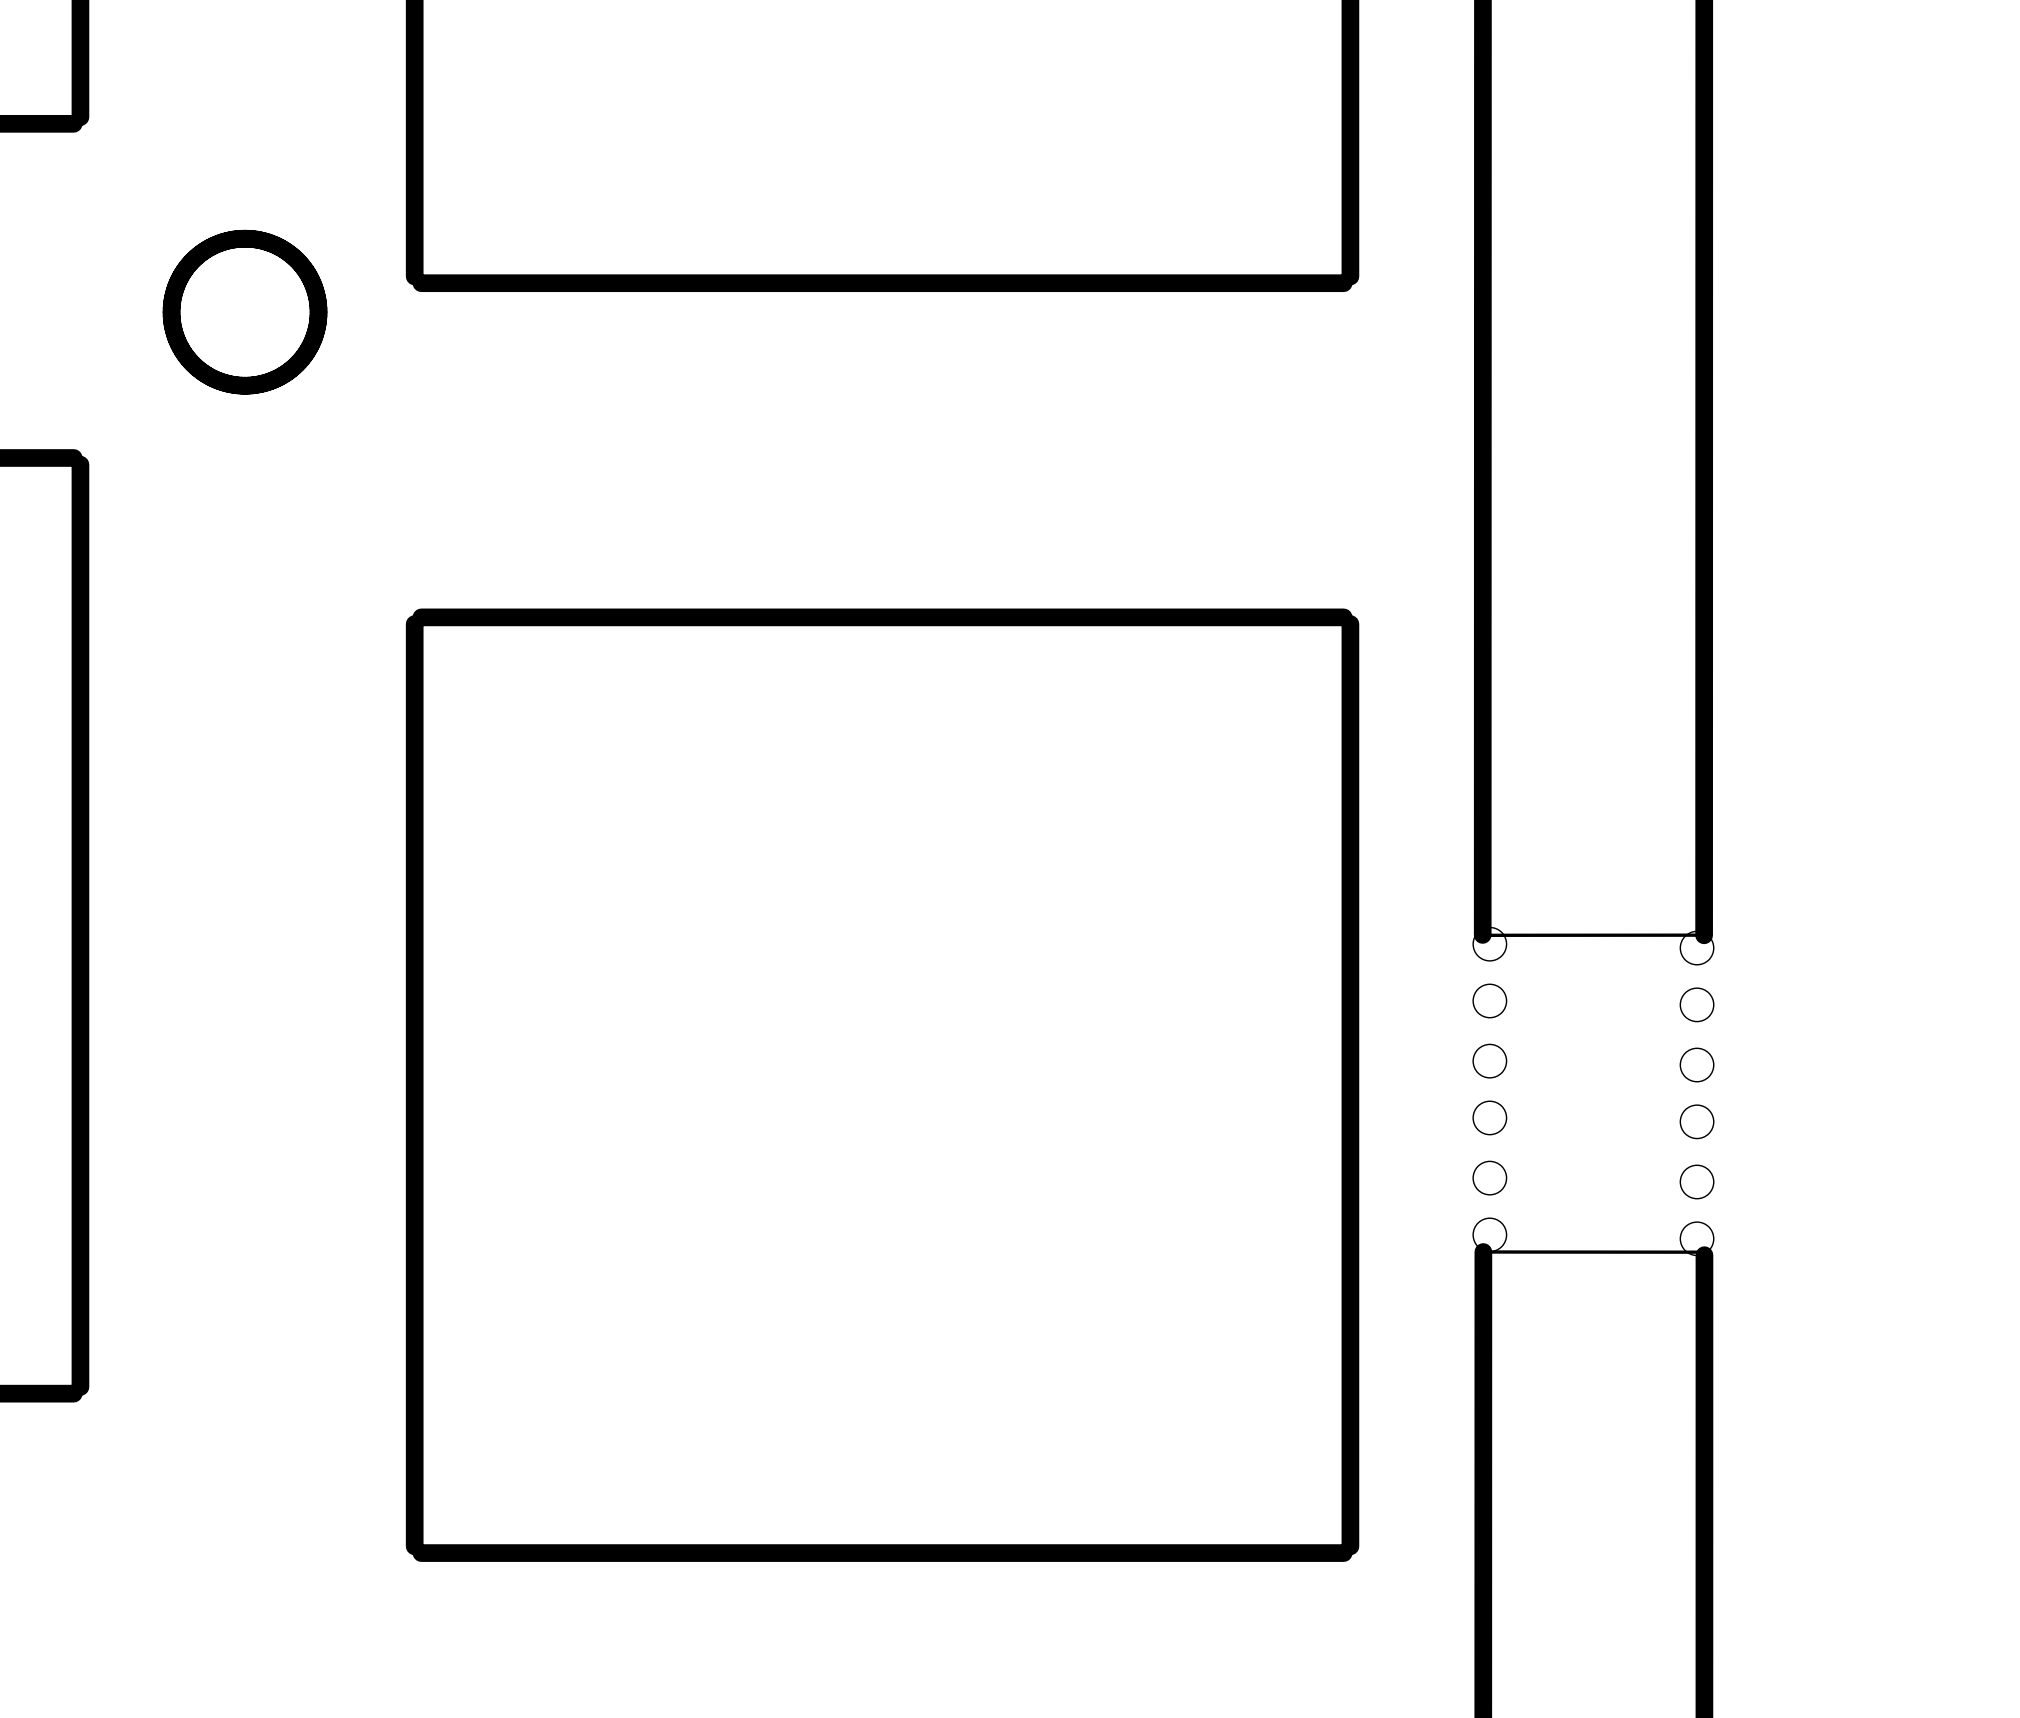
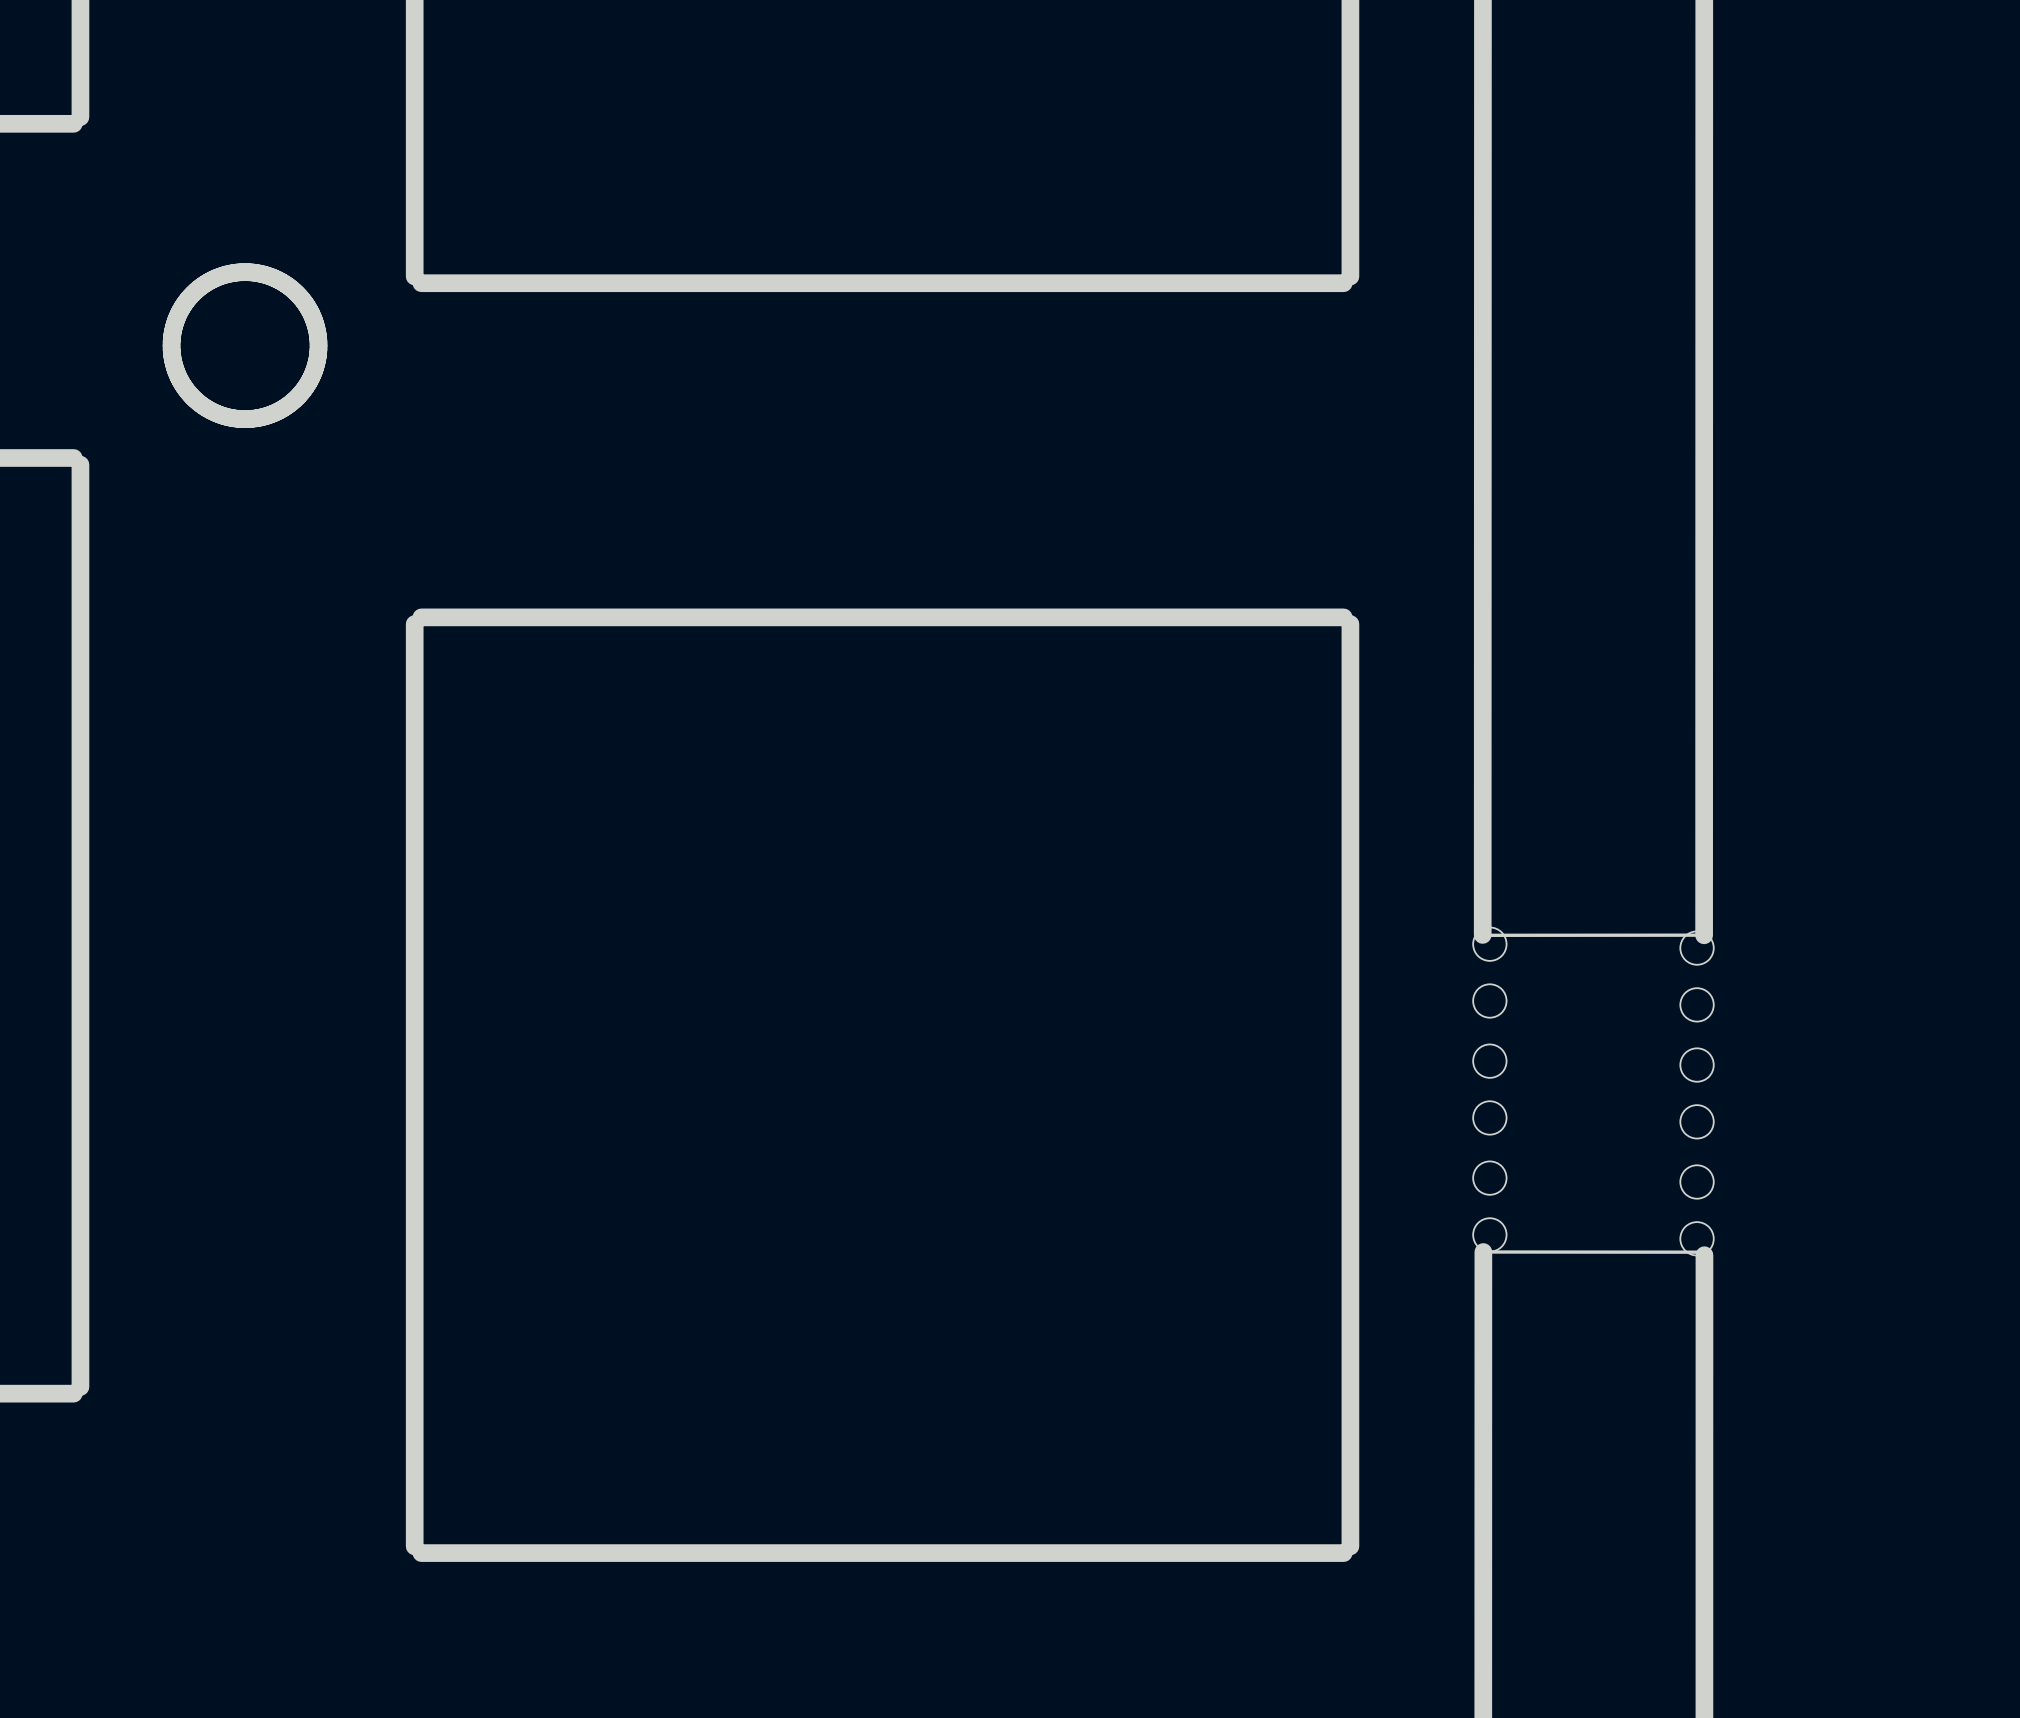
board edge: (237, 239) (210, 247) (188, 265) (174, 290) (171, 319) (180, 347) (198, 368) (223, 382) (252, 385) (280, 376) (301, 358) (315, 334) (318, 304) (309, 277) (291, 255) (266, 242) (237, 239) -> (237, 272) (210, 280) (188, 298) (174, 323) (171, 353) (180, 380) (198, 402) (223, 415) (252, 418) (280, 410) (301, 392) (315, 367) (318, 338) (309, 310) (291, 288) (266, 275) (237, 272)

